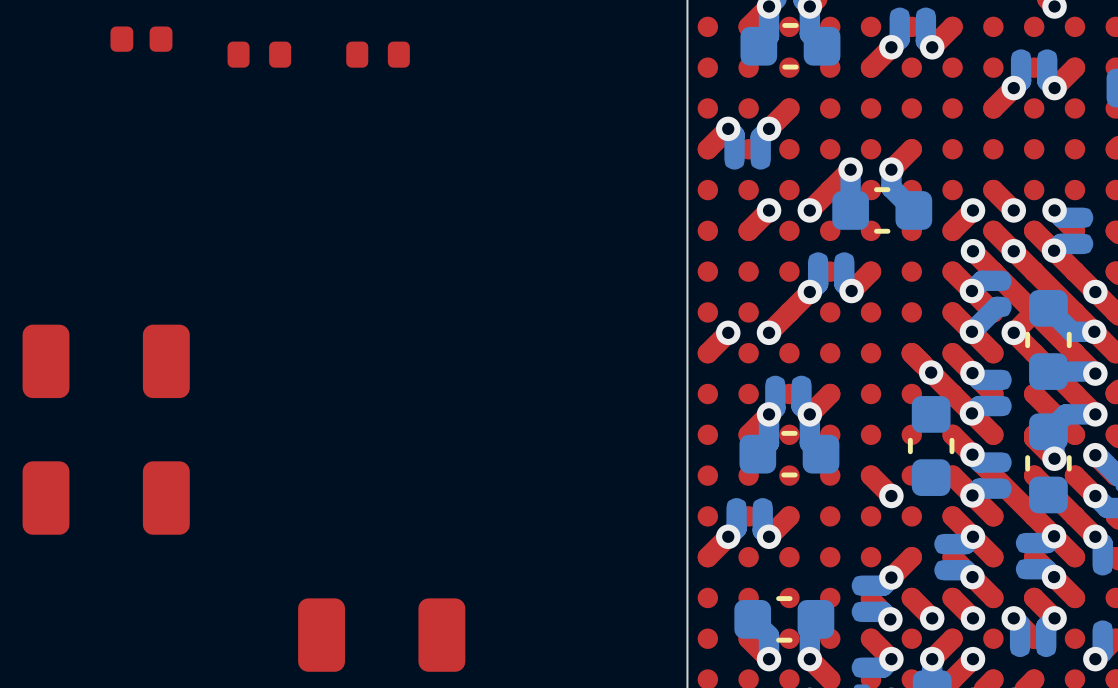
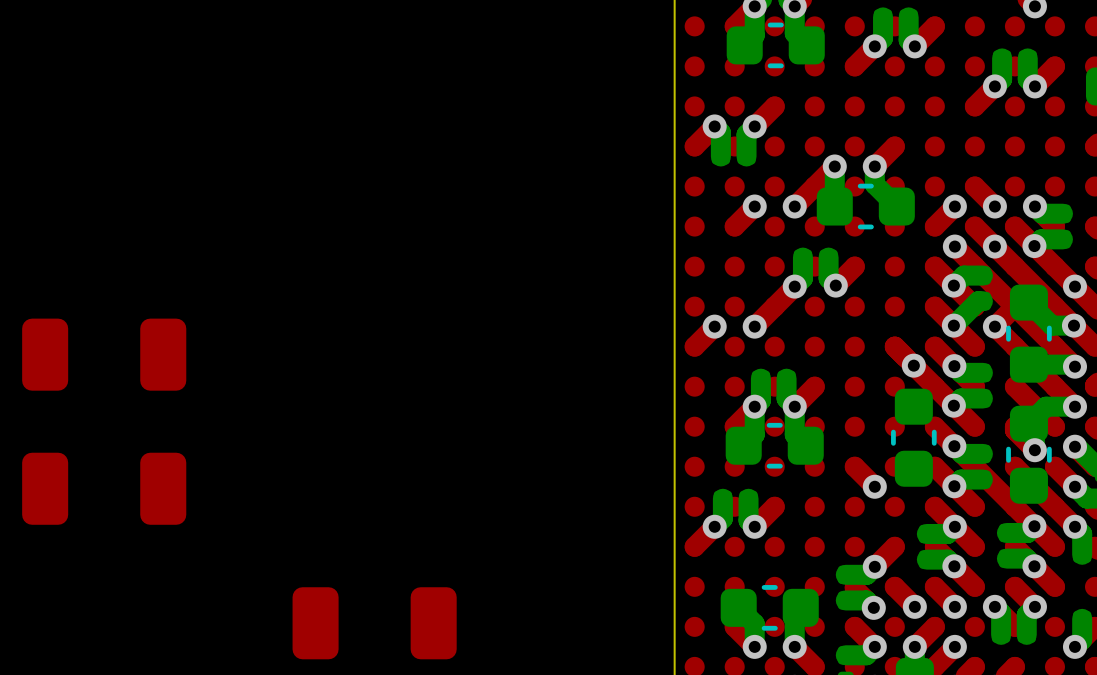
part: (141, 39) -> none
part: (259, 54) -> none
part: (378, 54) -> none

